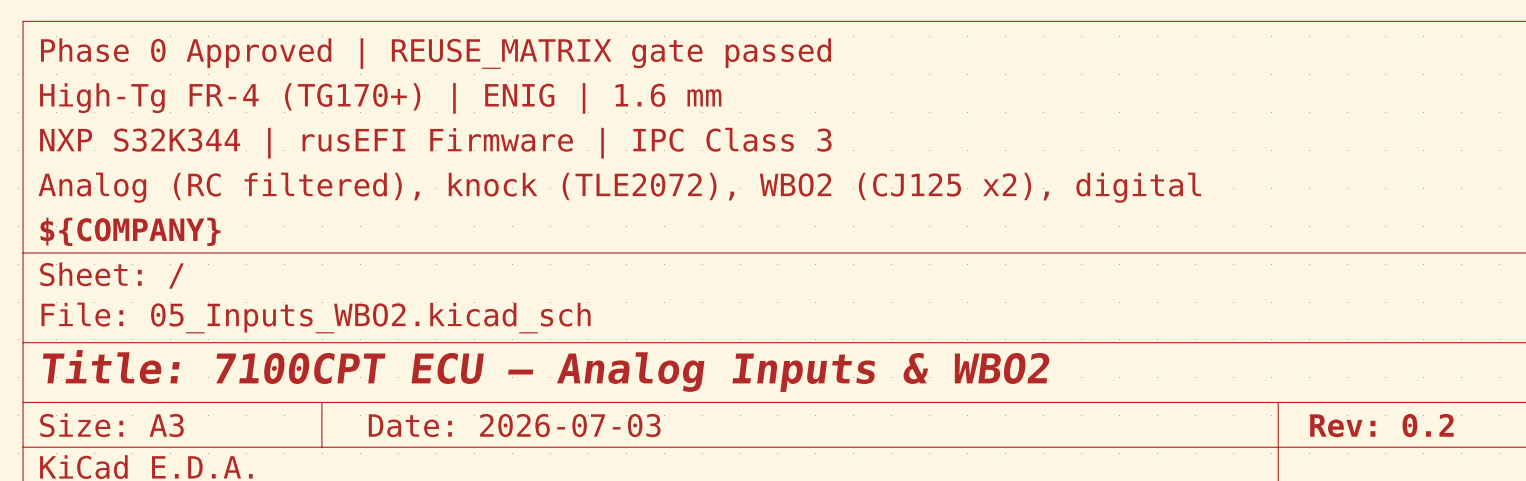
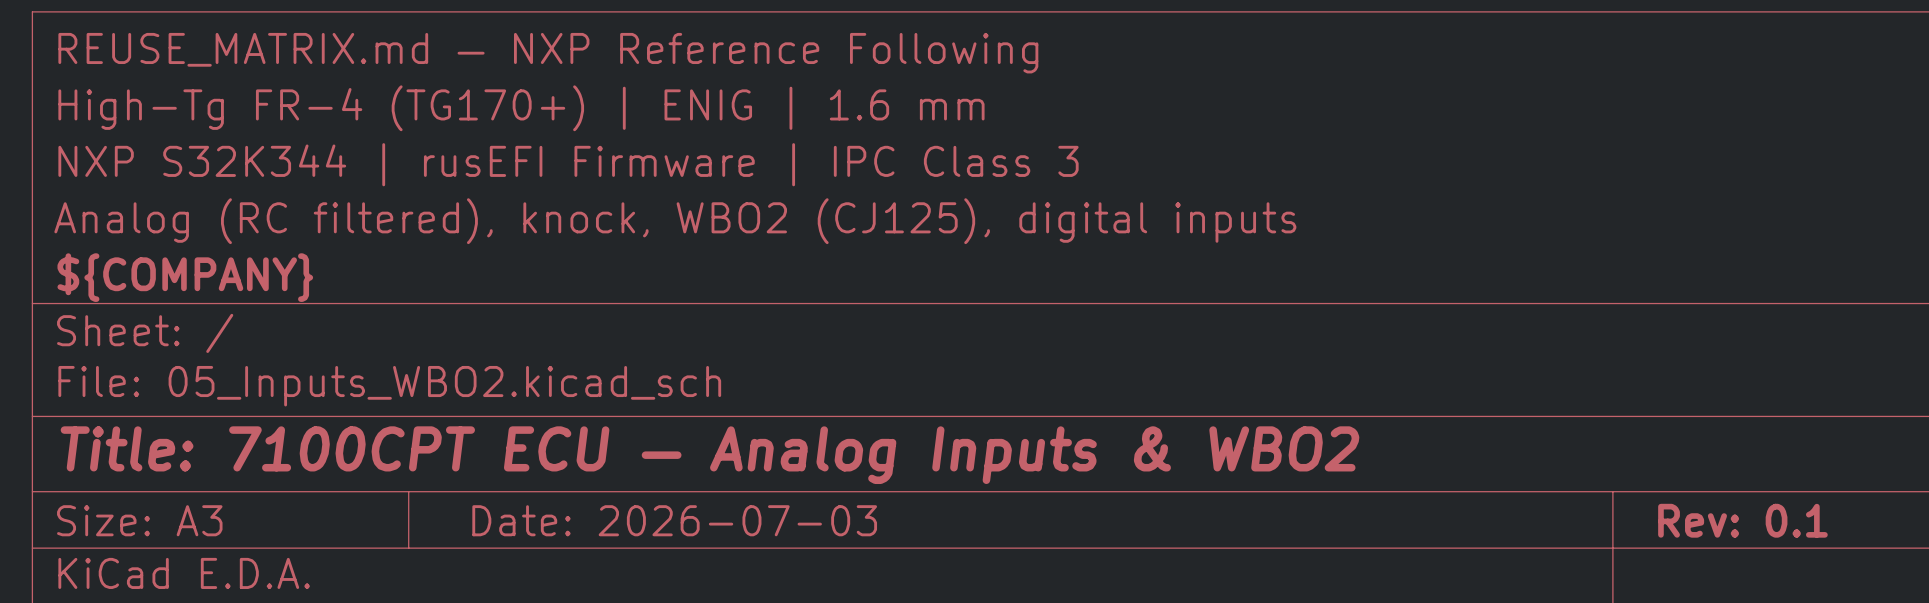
title block: Phase 0 Approved | REUSE_MATRIX gate passed (436, 53) -> REUSE_MATRIX.md — NXP Reference Following (548, 53)
title block: Analog (RC filtered), knock (TLE2072), WBO2 (CJ125 x2), digital (619, 187) -> Analog (RC filtered), knock, WBO2 (CJ125), digital inputs (675, 221)
title block: Rev: 0.2 (1381, 425) -> Rev: 0.1 (1742, 520)

